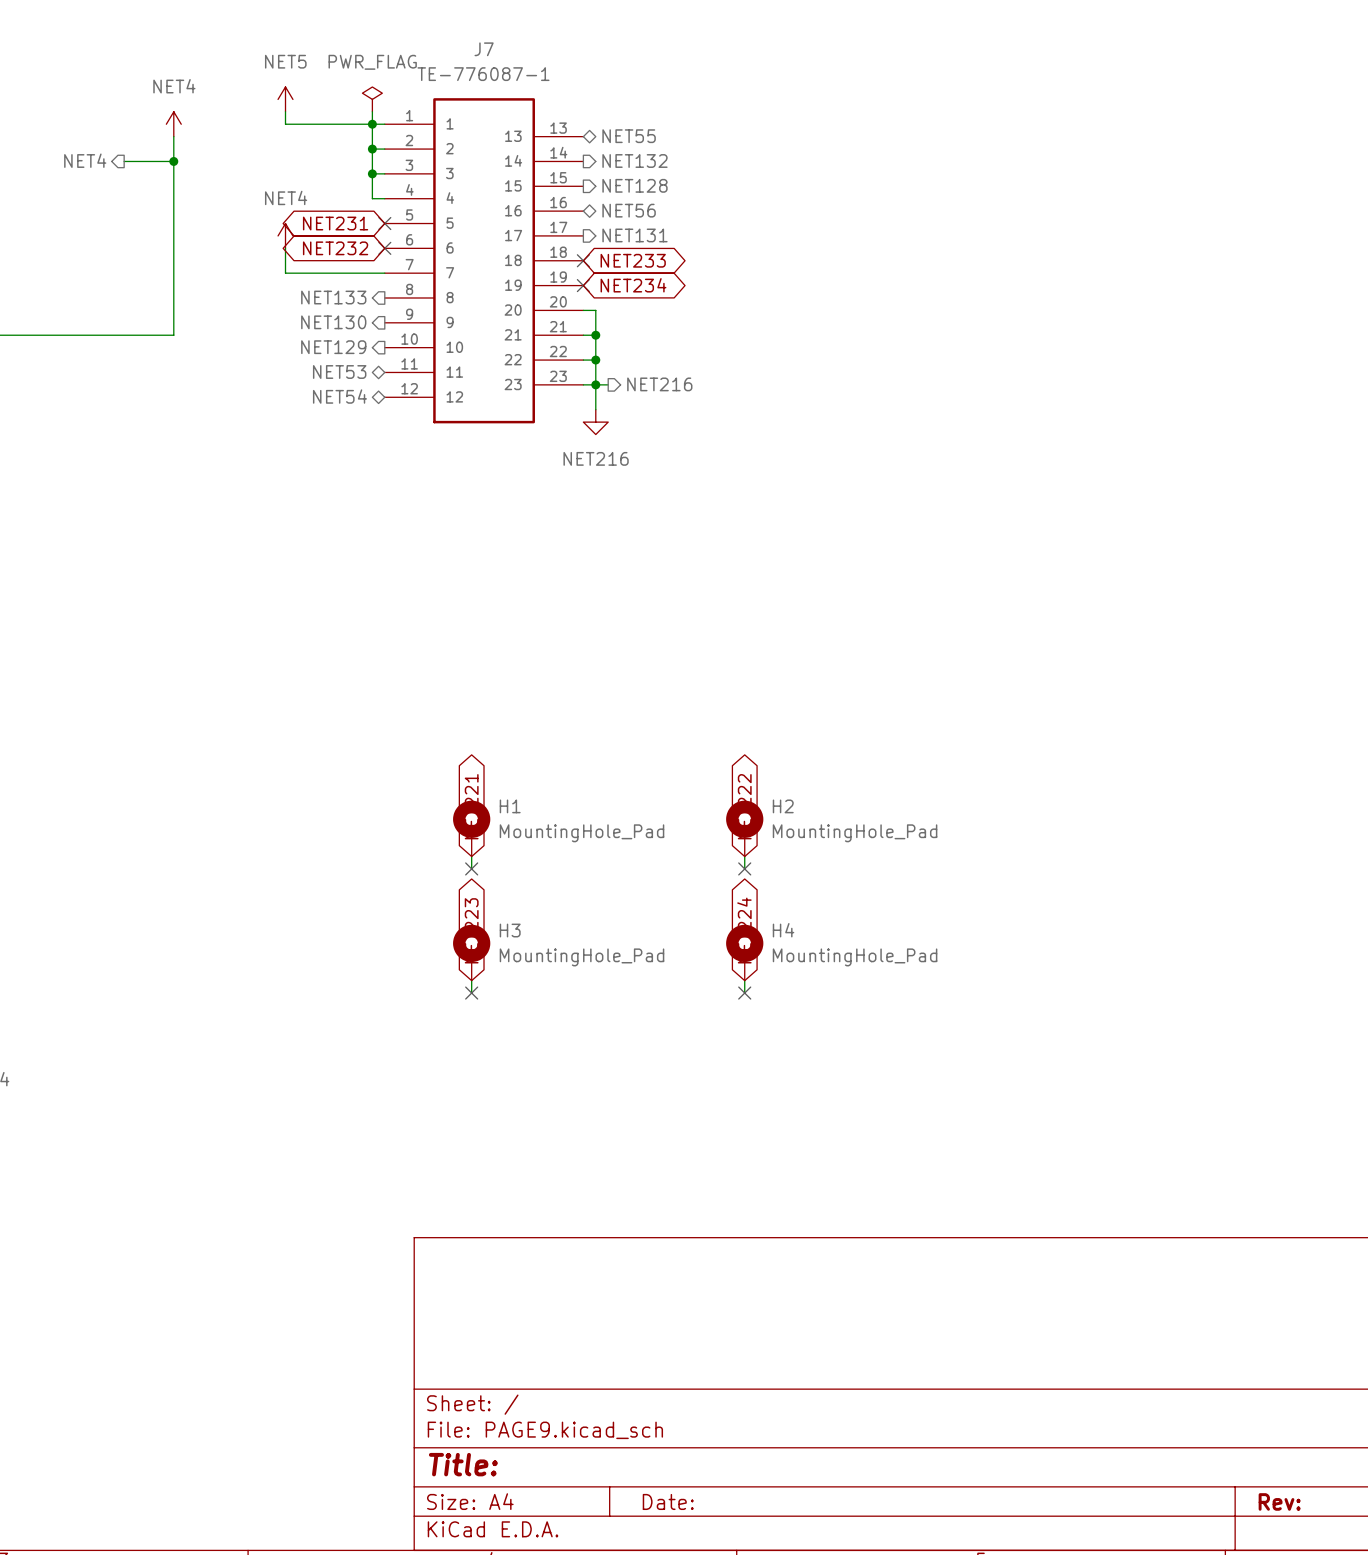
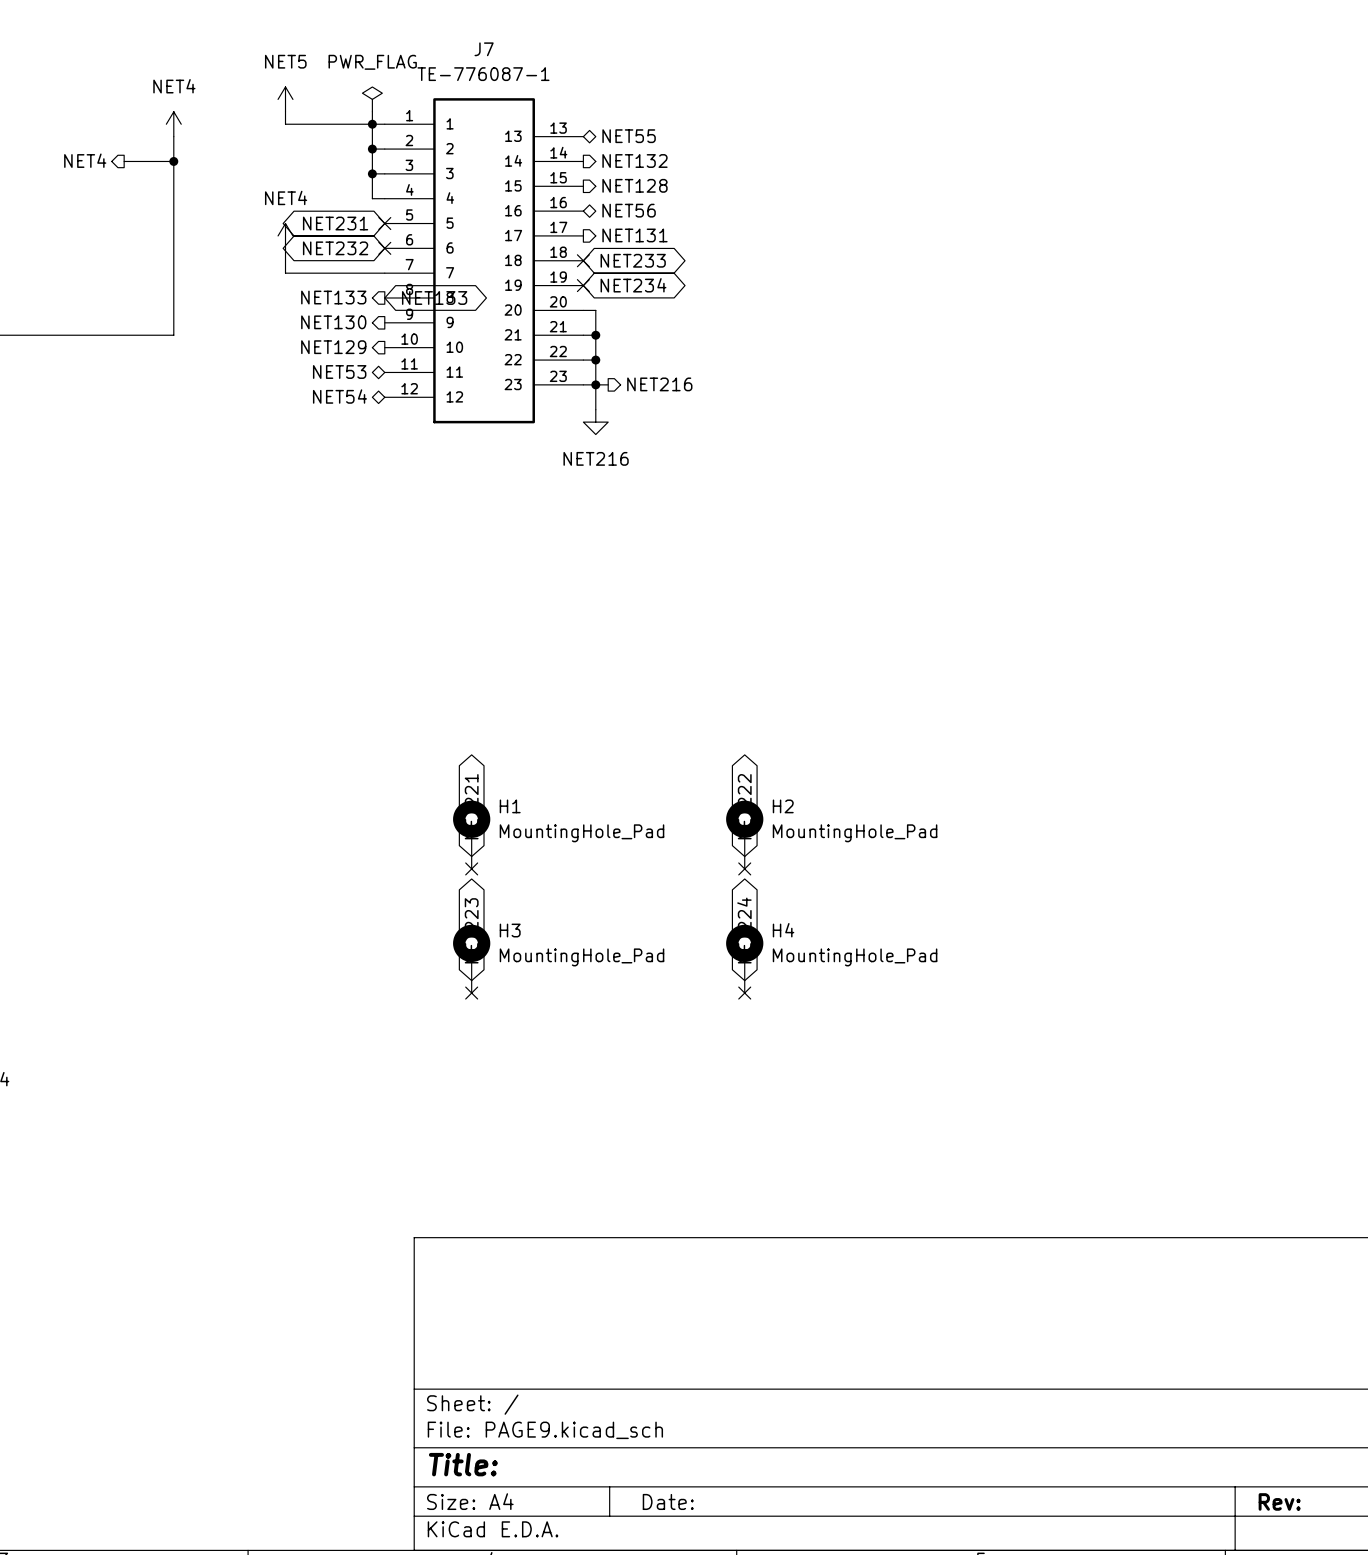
global label: none -> NET133 (434, 297)

